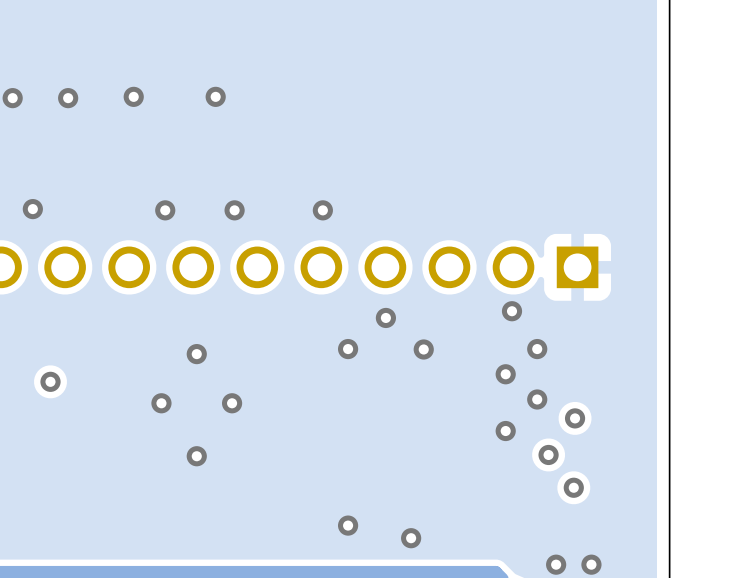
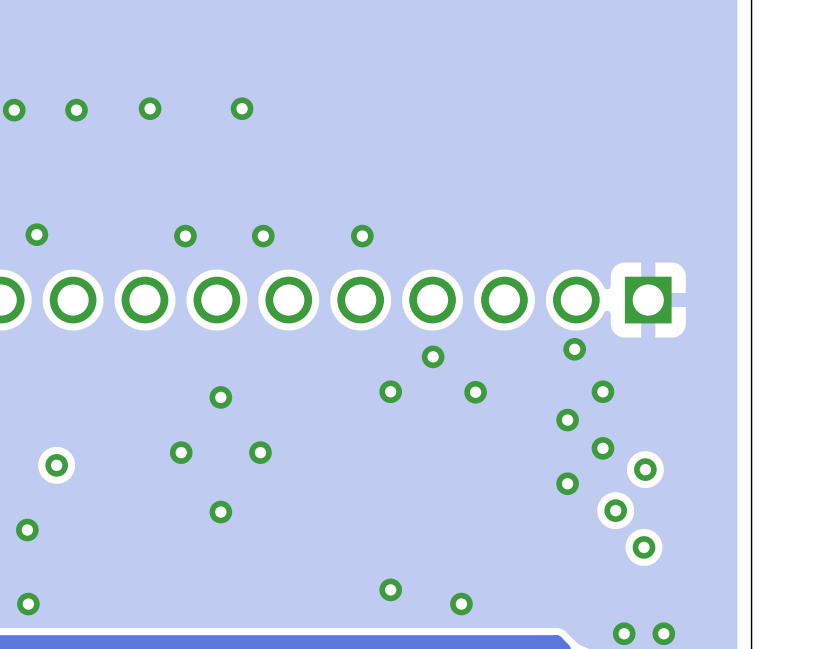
via position: (50, 381) -> (56, 465)
via: none -> (27, 530)
via: none -> (28, 604)

